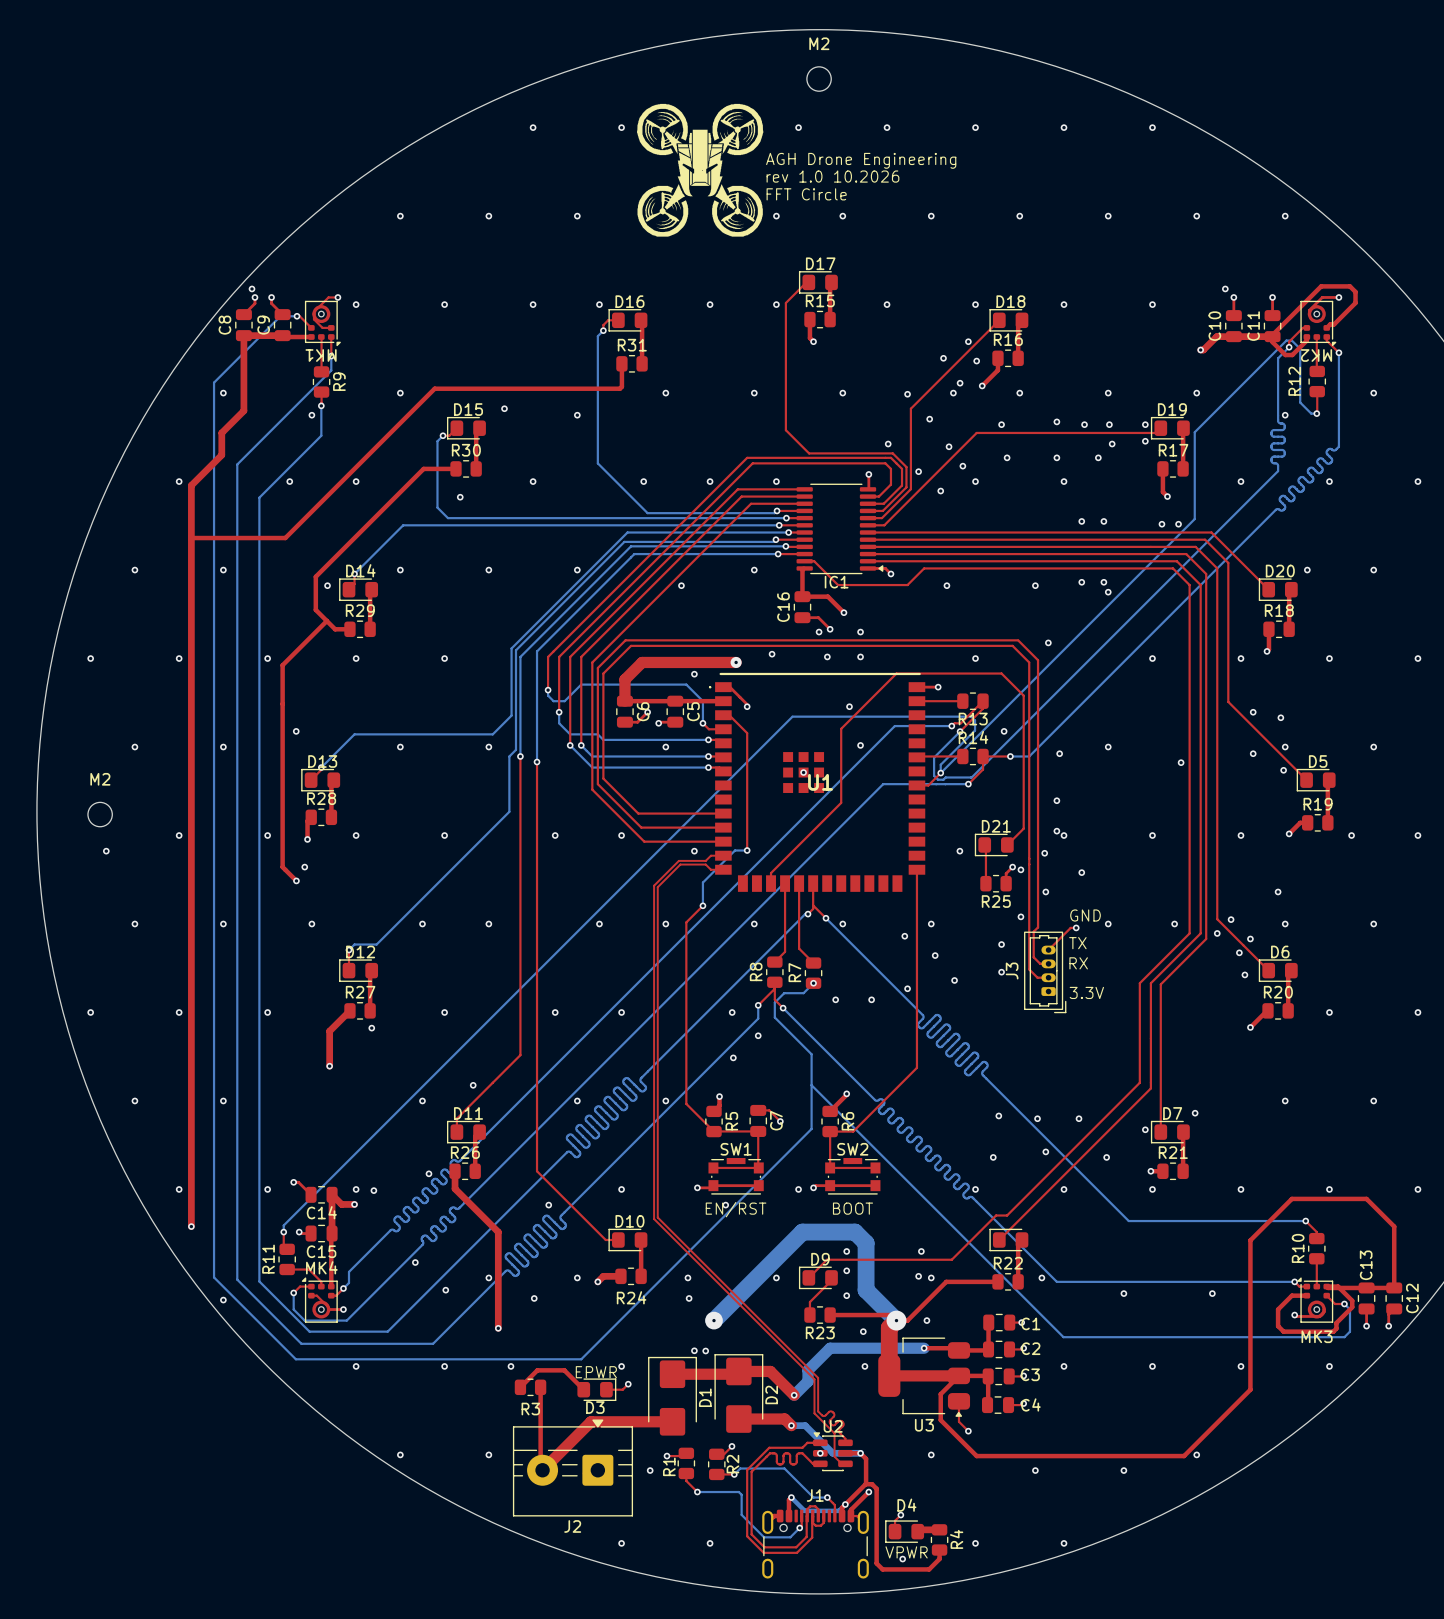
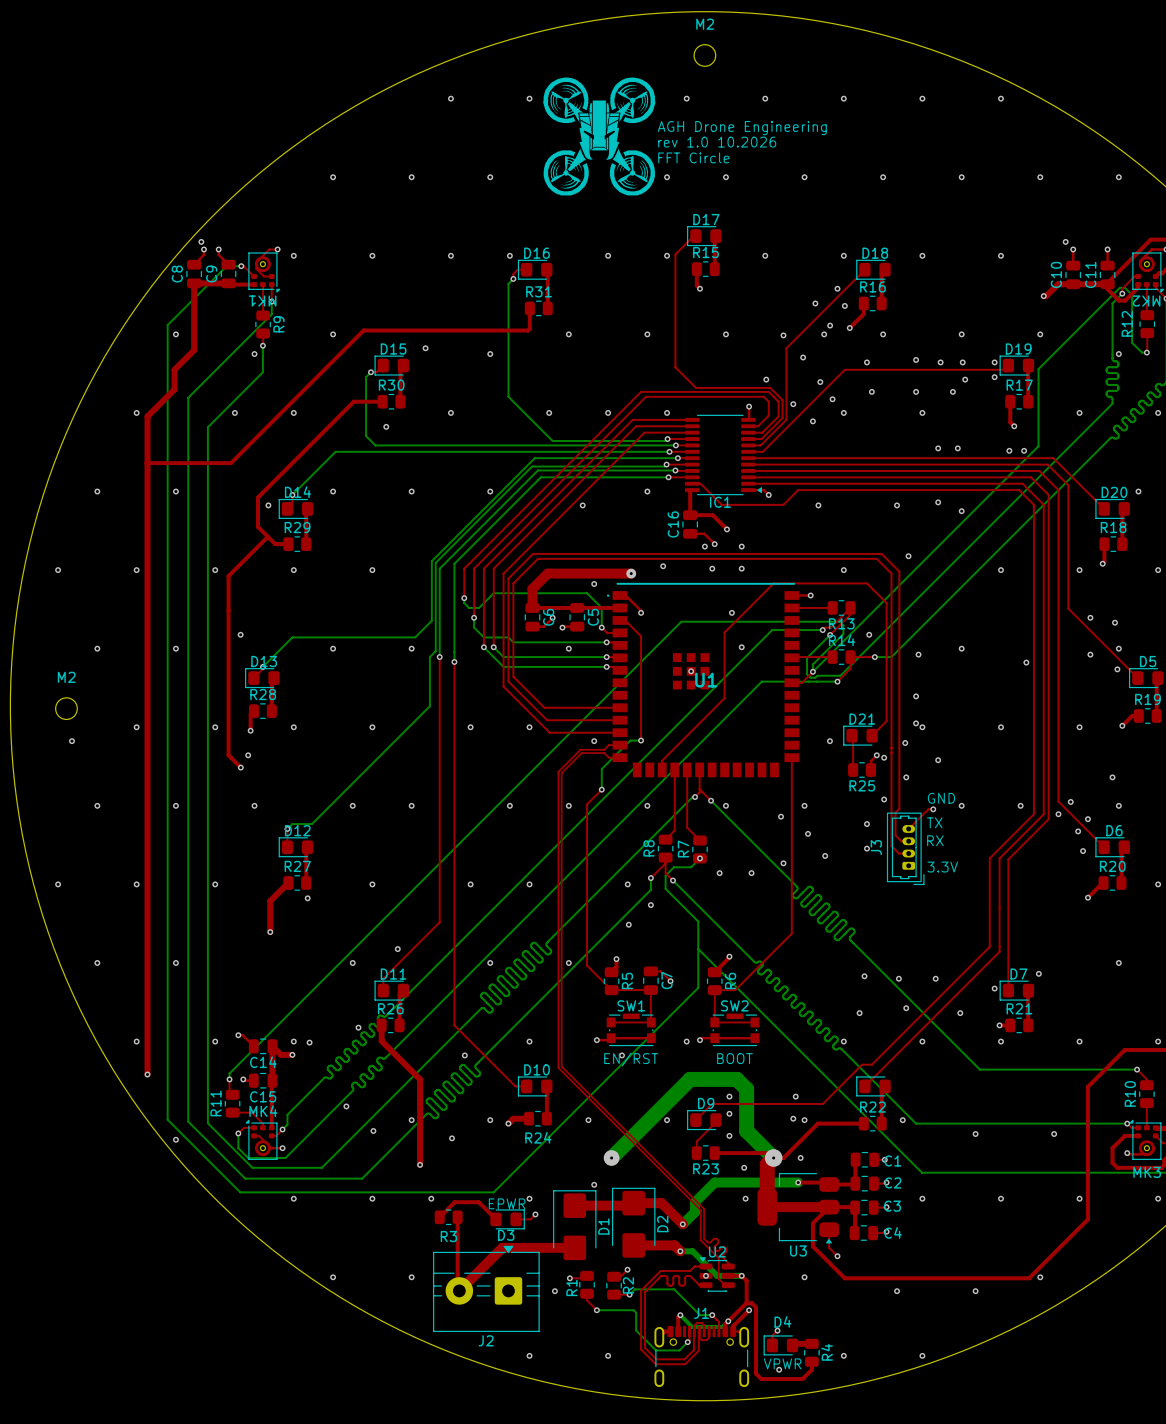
via: (1103, 582) -> none
via: (689, 1298) -> none
via: (705, 1351) -> none

